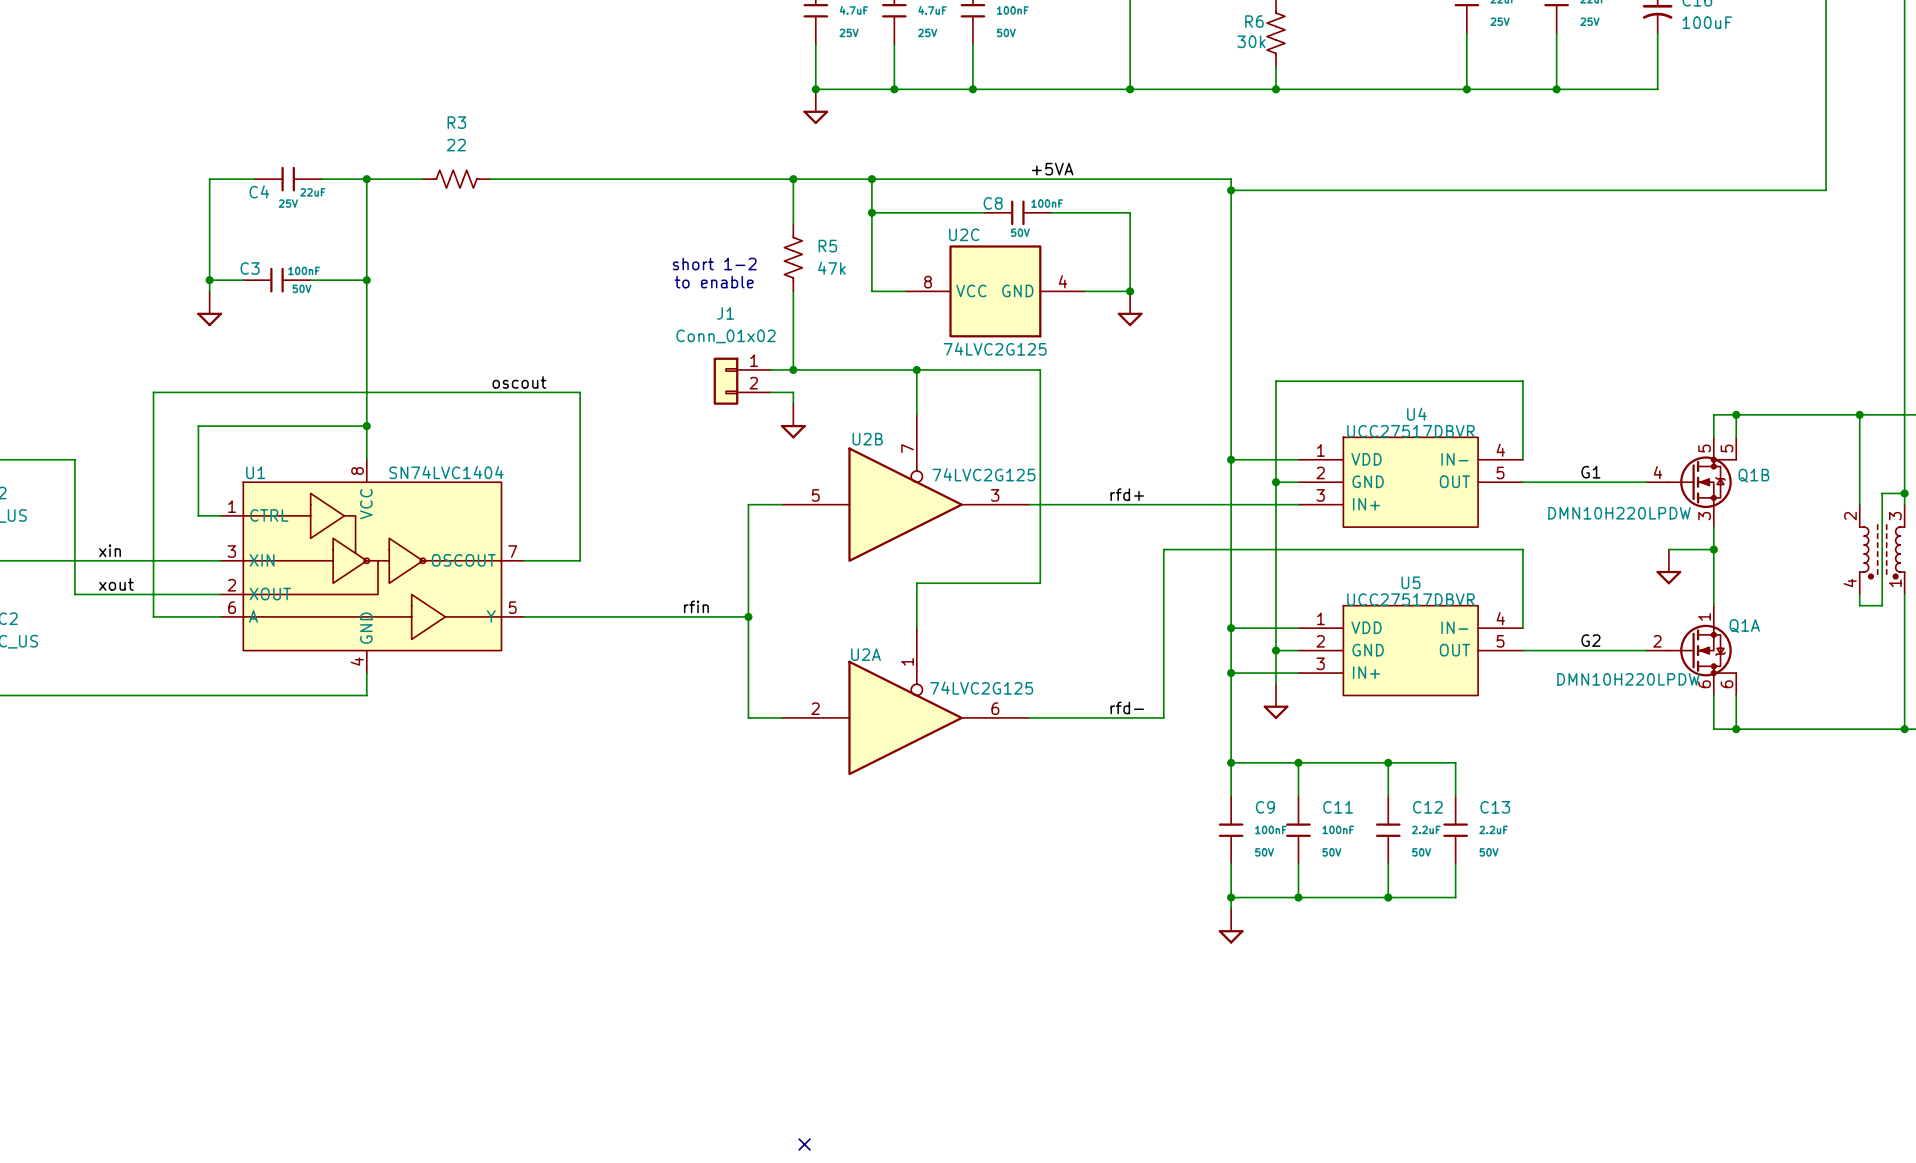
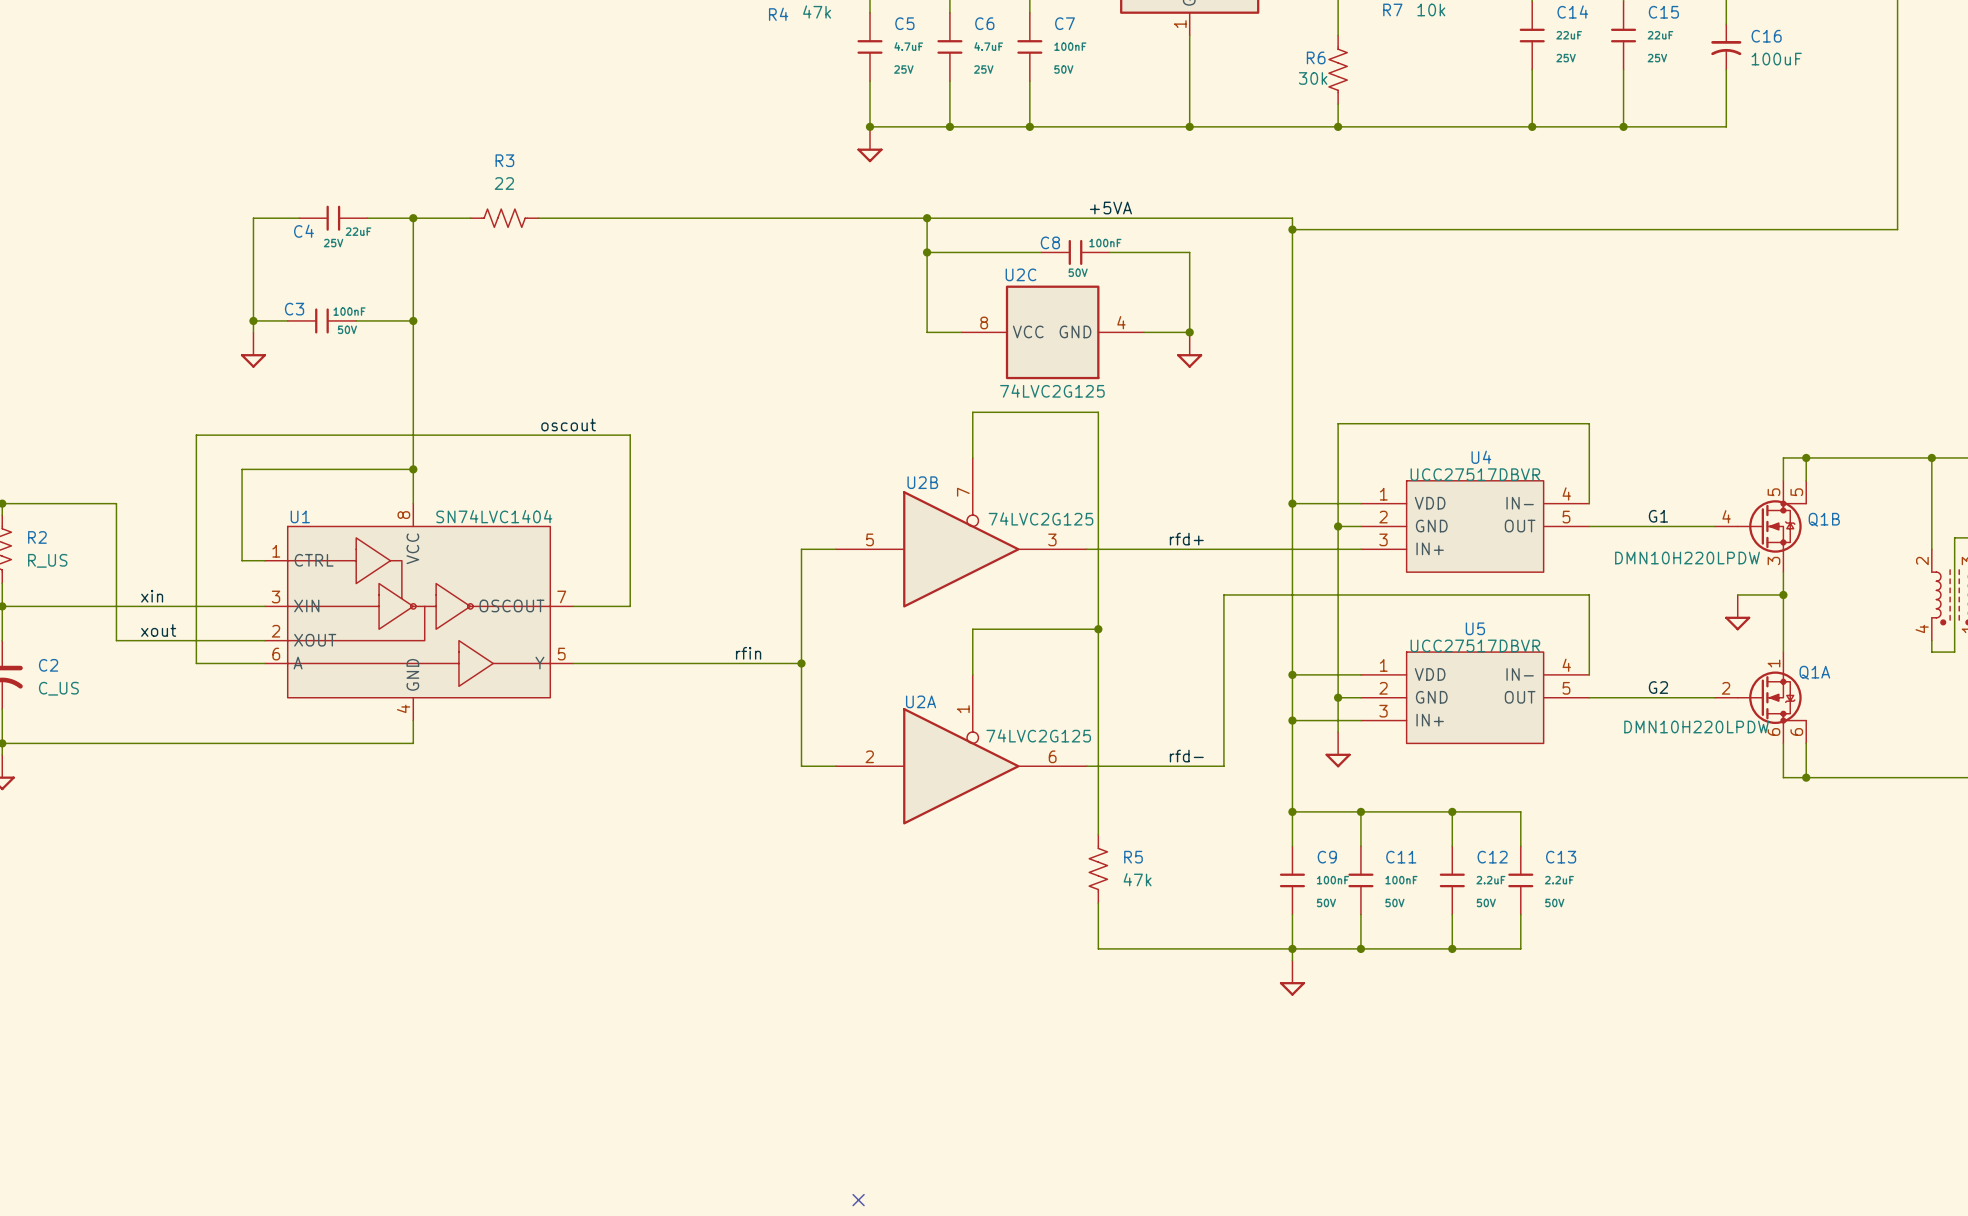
wire: (793, 179) (793, 224) -> none
junction: (793, 179) -> none
R5 position: (793, 257) -> (1098, 869)
text: short 1-2 (714, 264) -> none
text: to enable (714, 282) -> none
wire: (793, 291) (793, 369) -> none
wire: (770, 369) (916, 369) -> none
junction: (793, 369) -> none
junction: (916, 369) -> none
J1: Conn_01x02 (742, 381) -> none
wire: (770, 392) (793, 392) (793, 403) -> none
power symbol: (793, 421) -> none
wire: none -> (1098, 629) (1098, 834)
junction: none -> (1098, 629)
wire: none -> (1098, 903) (1098, 948) (1292, 948)

